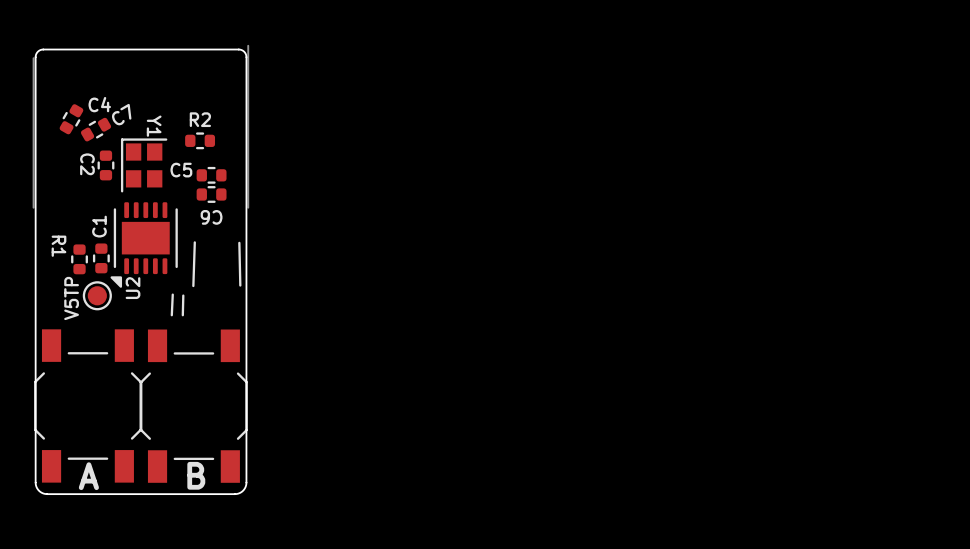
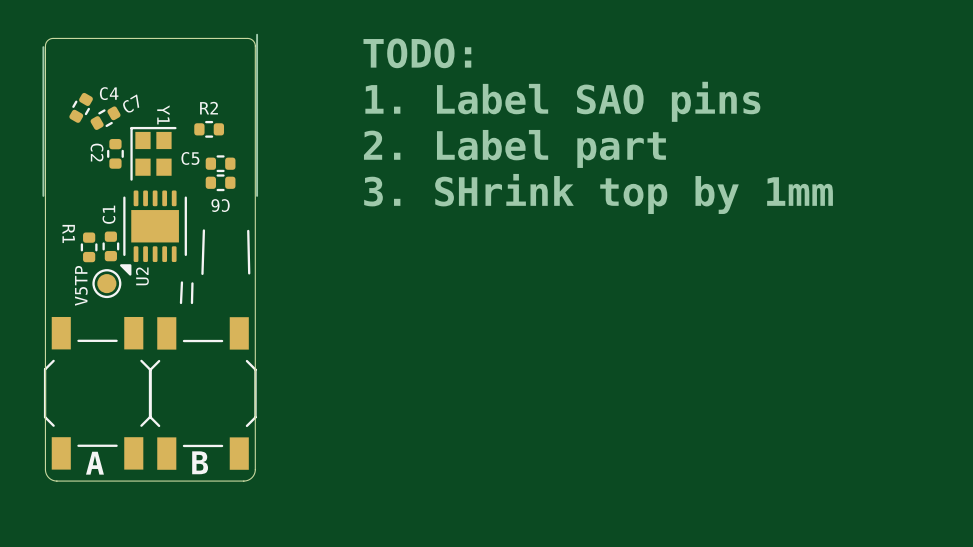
text: none -> TODO: (417, 53)
text: none -> 1. Label SAO pins (562, 101)
text: none -> 2. Label part (514, 148)
text: none -> 3. SHrink top by 1mm (598, 193)

